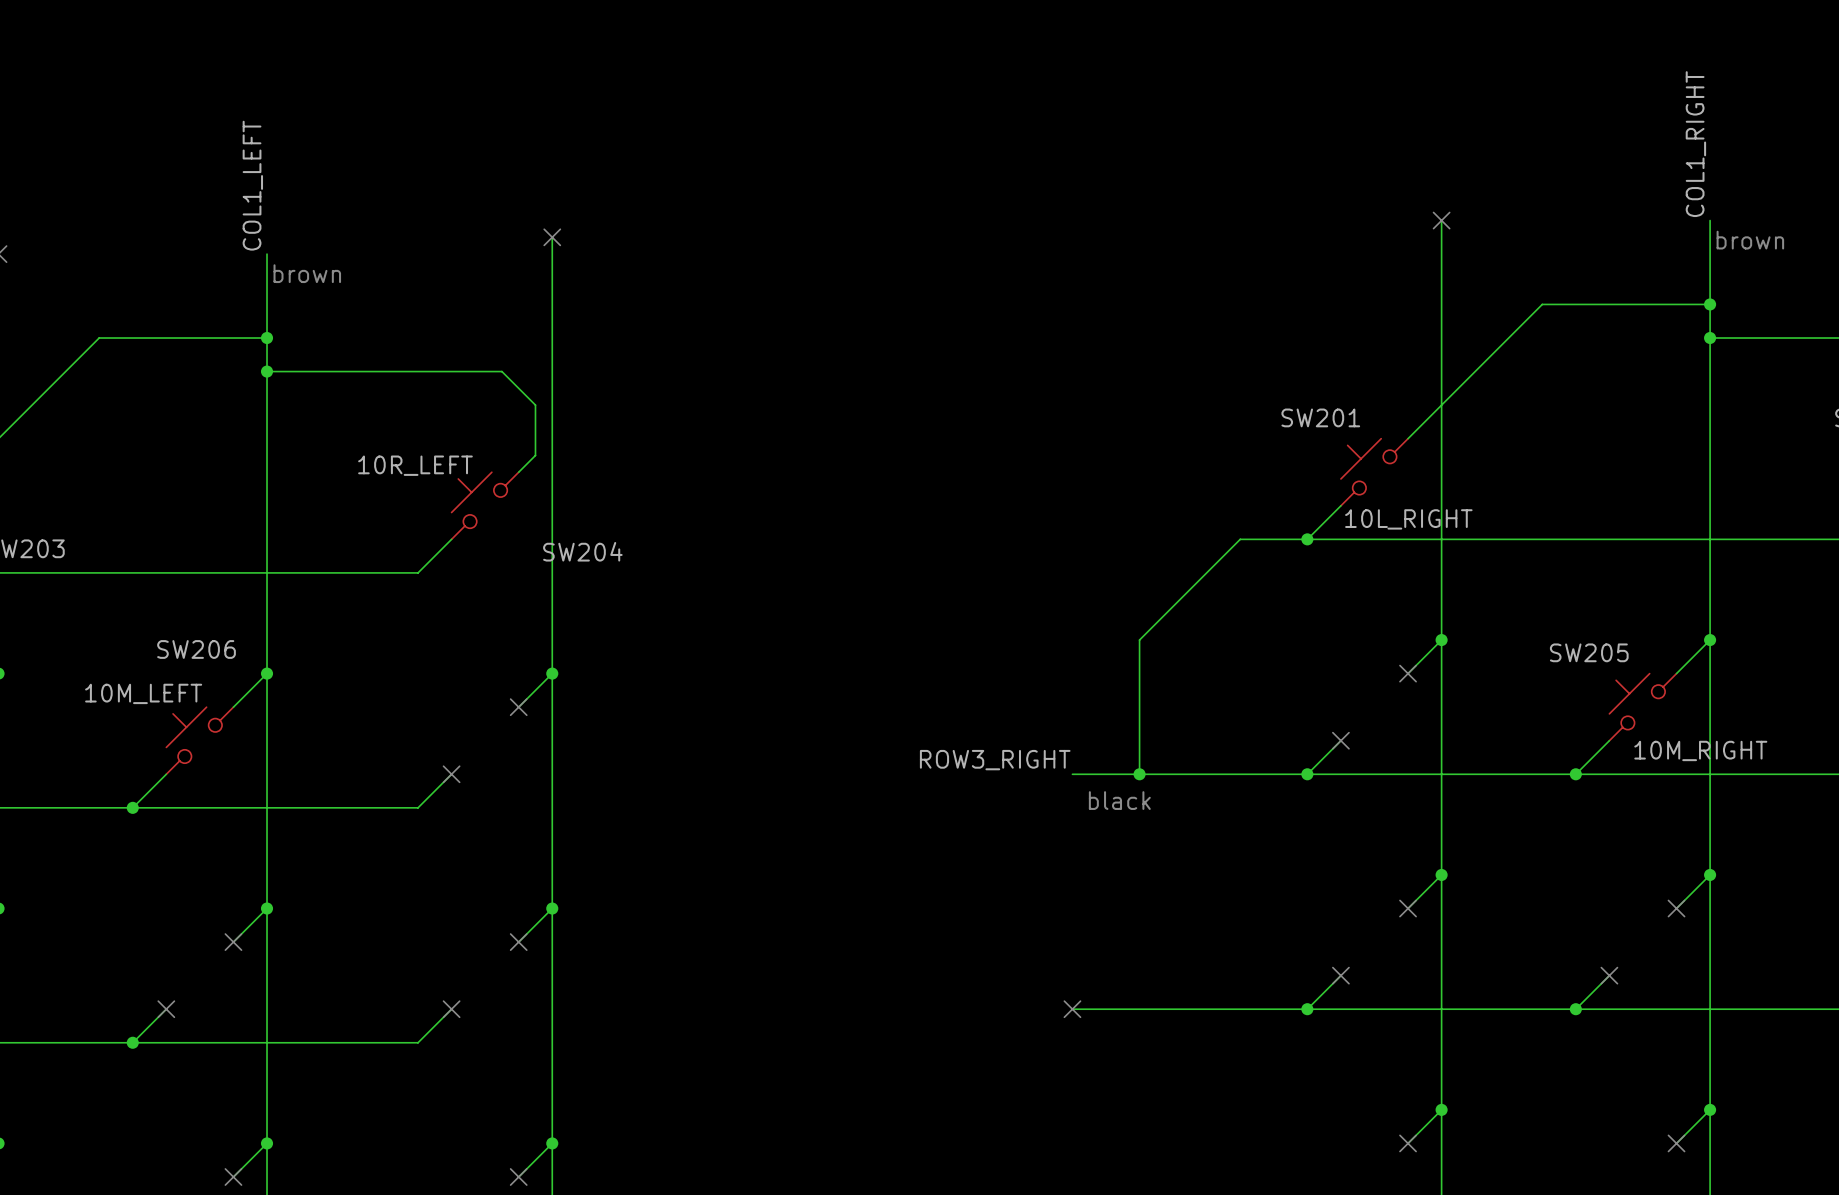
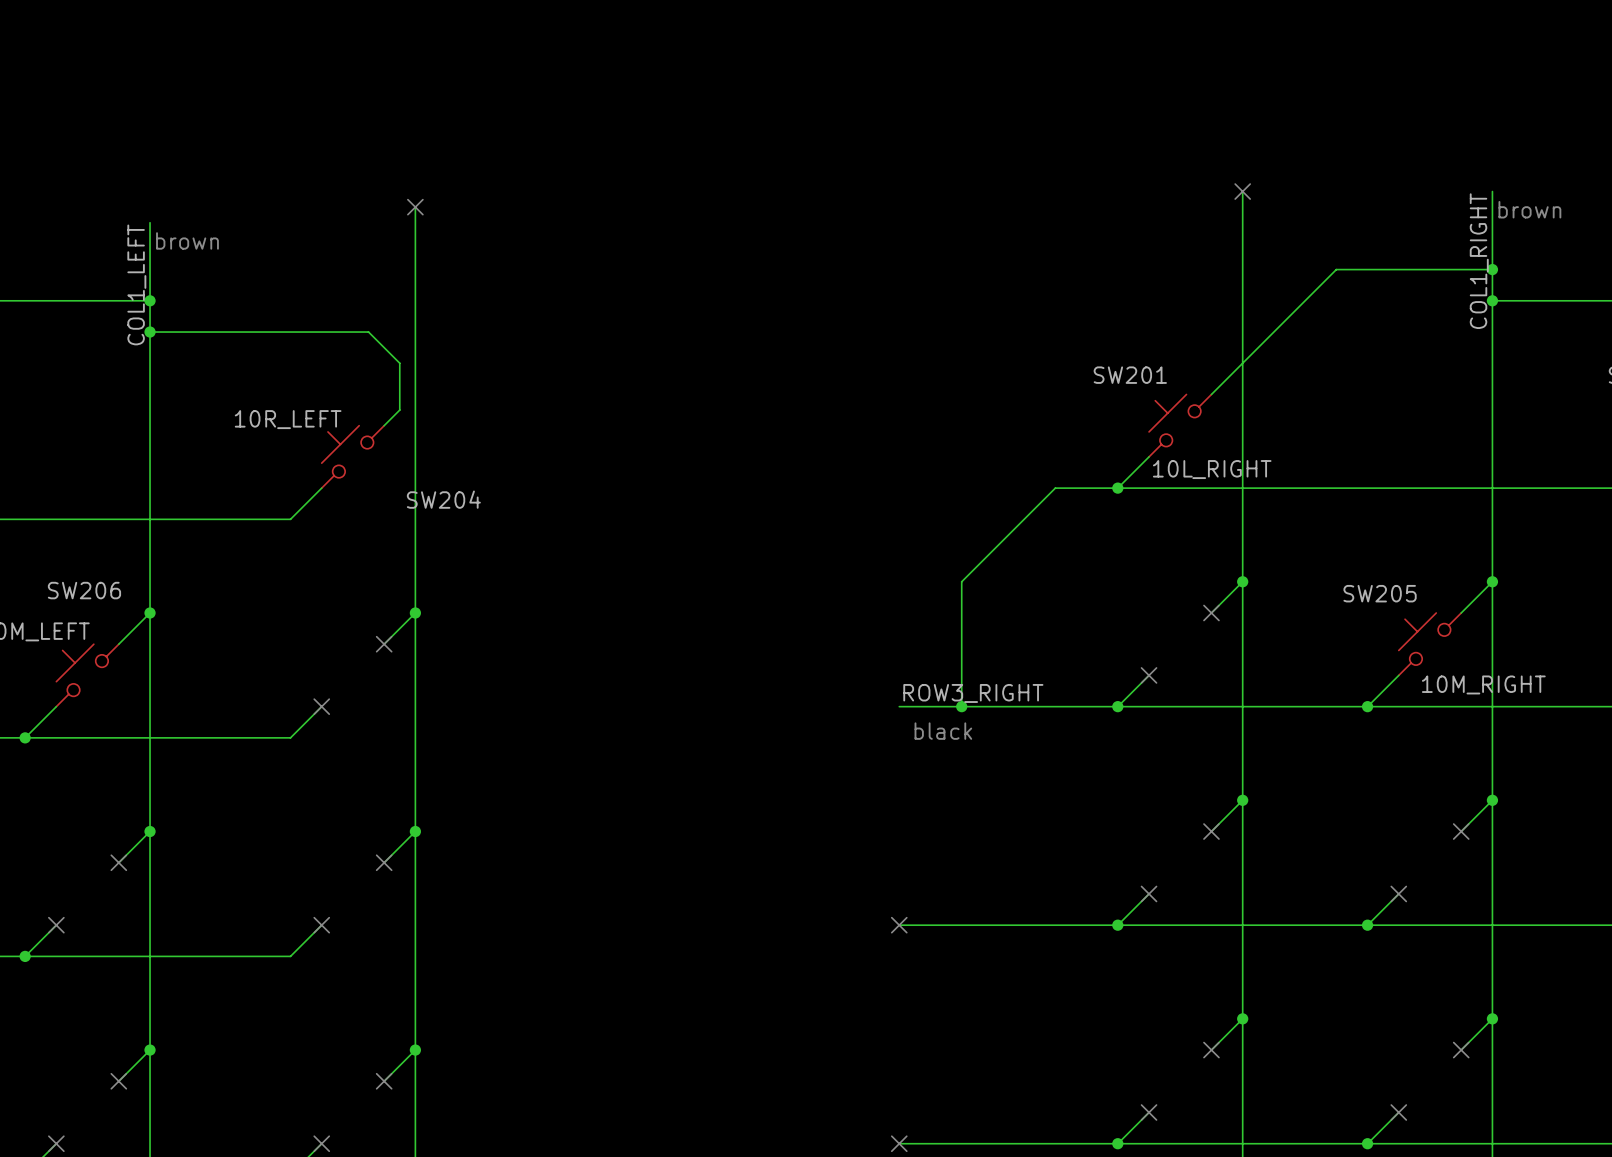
label position: COL1_RIGHT (1695, 144) -> COL1_RIGHT (1479, 261)
label position: COL1_LEFT (252, 185) -> COL1_LEFT (136, 284)
label position: ROW3_RIGHT (995, 760) -> ROW3_RIGHT (973, 693)

